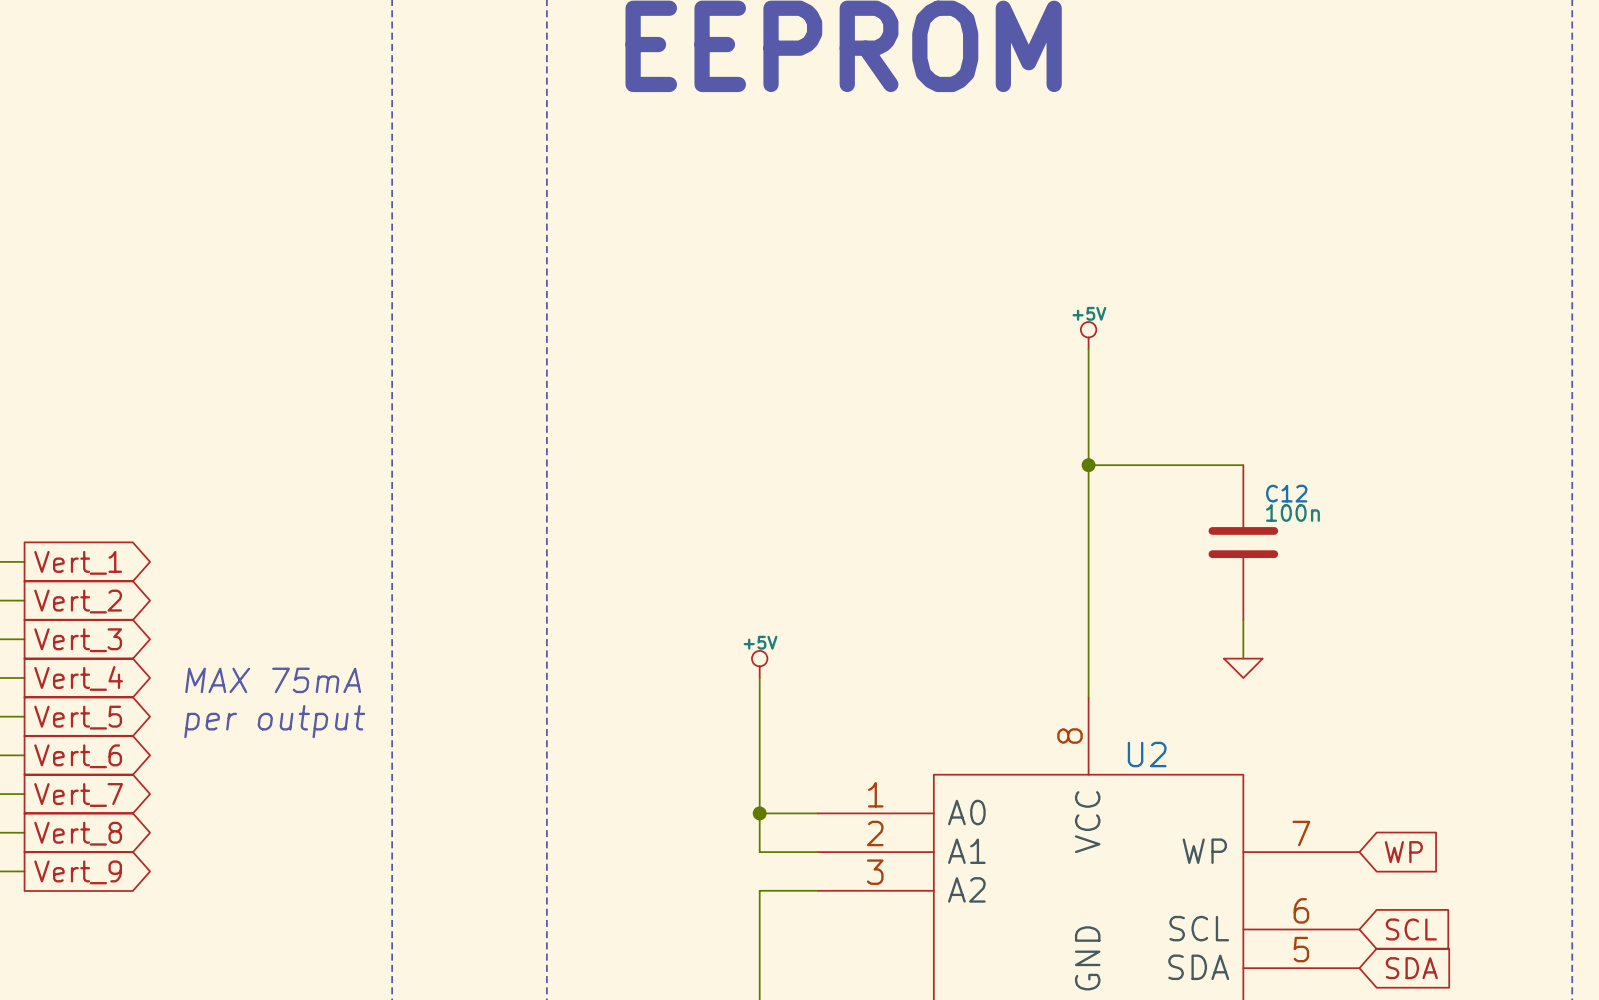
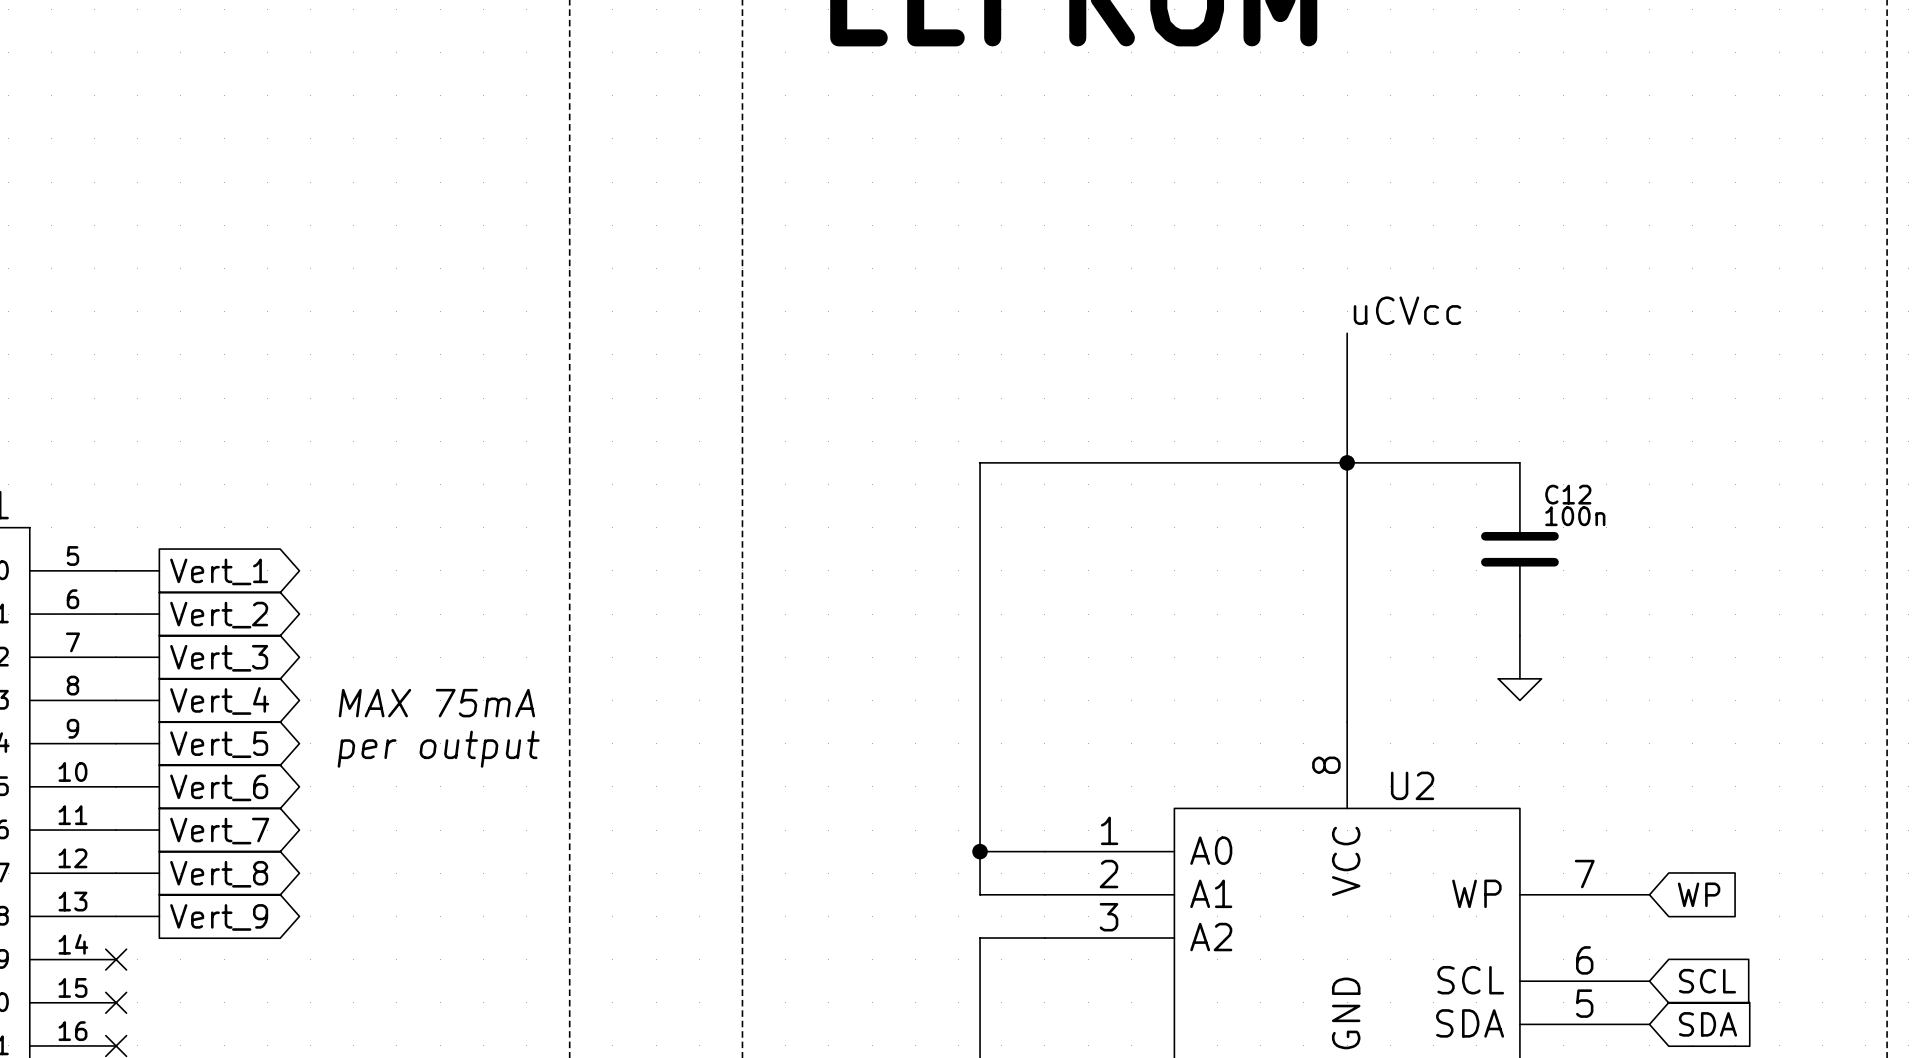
label: none -> uCVcc (1407, 310)
power symbol: +5V (1088, 335) -> none
wire: none -> (1347, 462) (980, 462) (980, 700)
power symbol: +5V (759, 664) -> none

